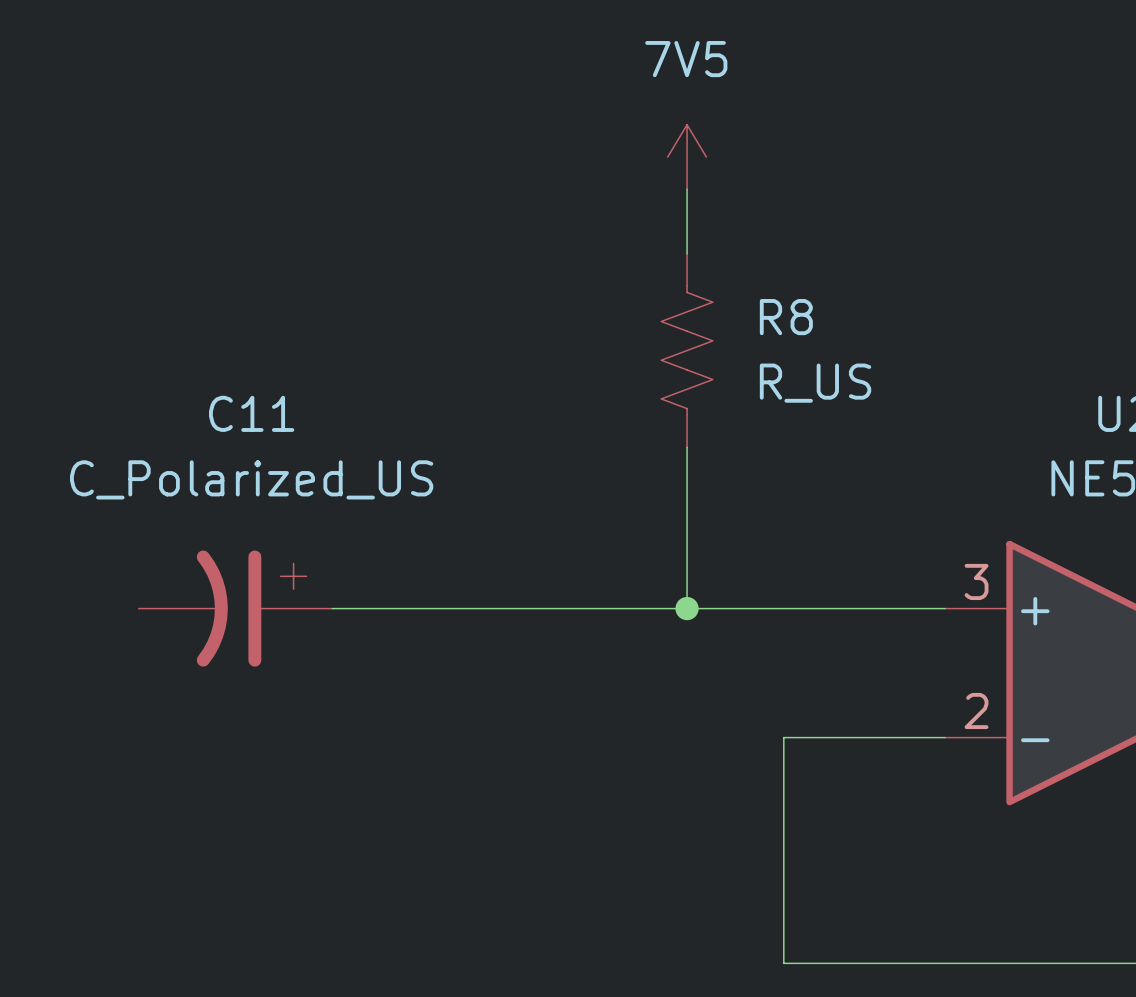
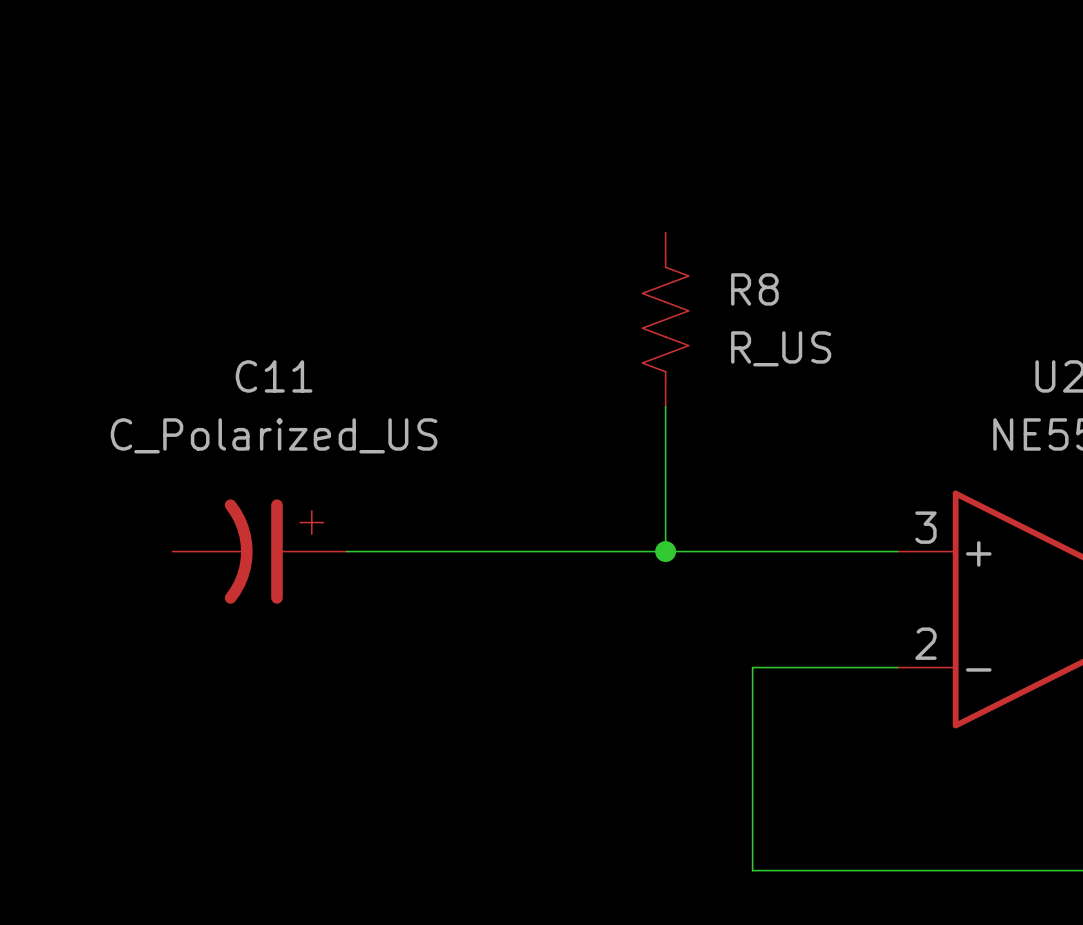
power symbol: 7V5 (687, 157) -> none
wire: (687, 189) (687, 253) -> none

